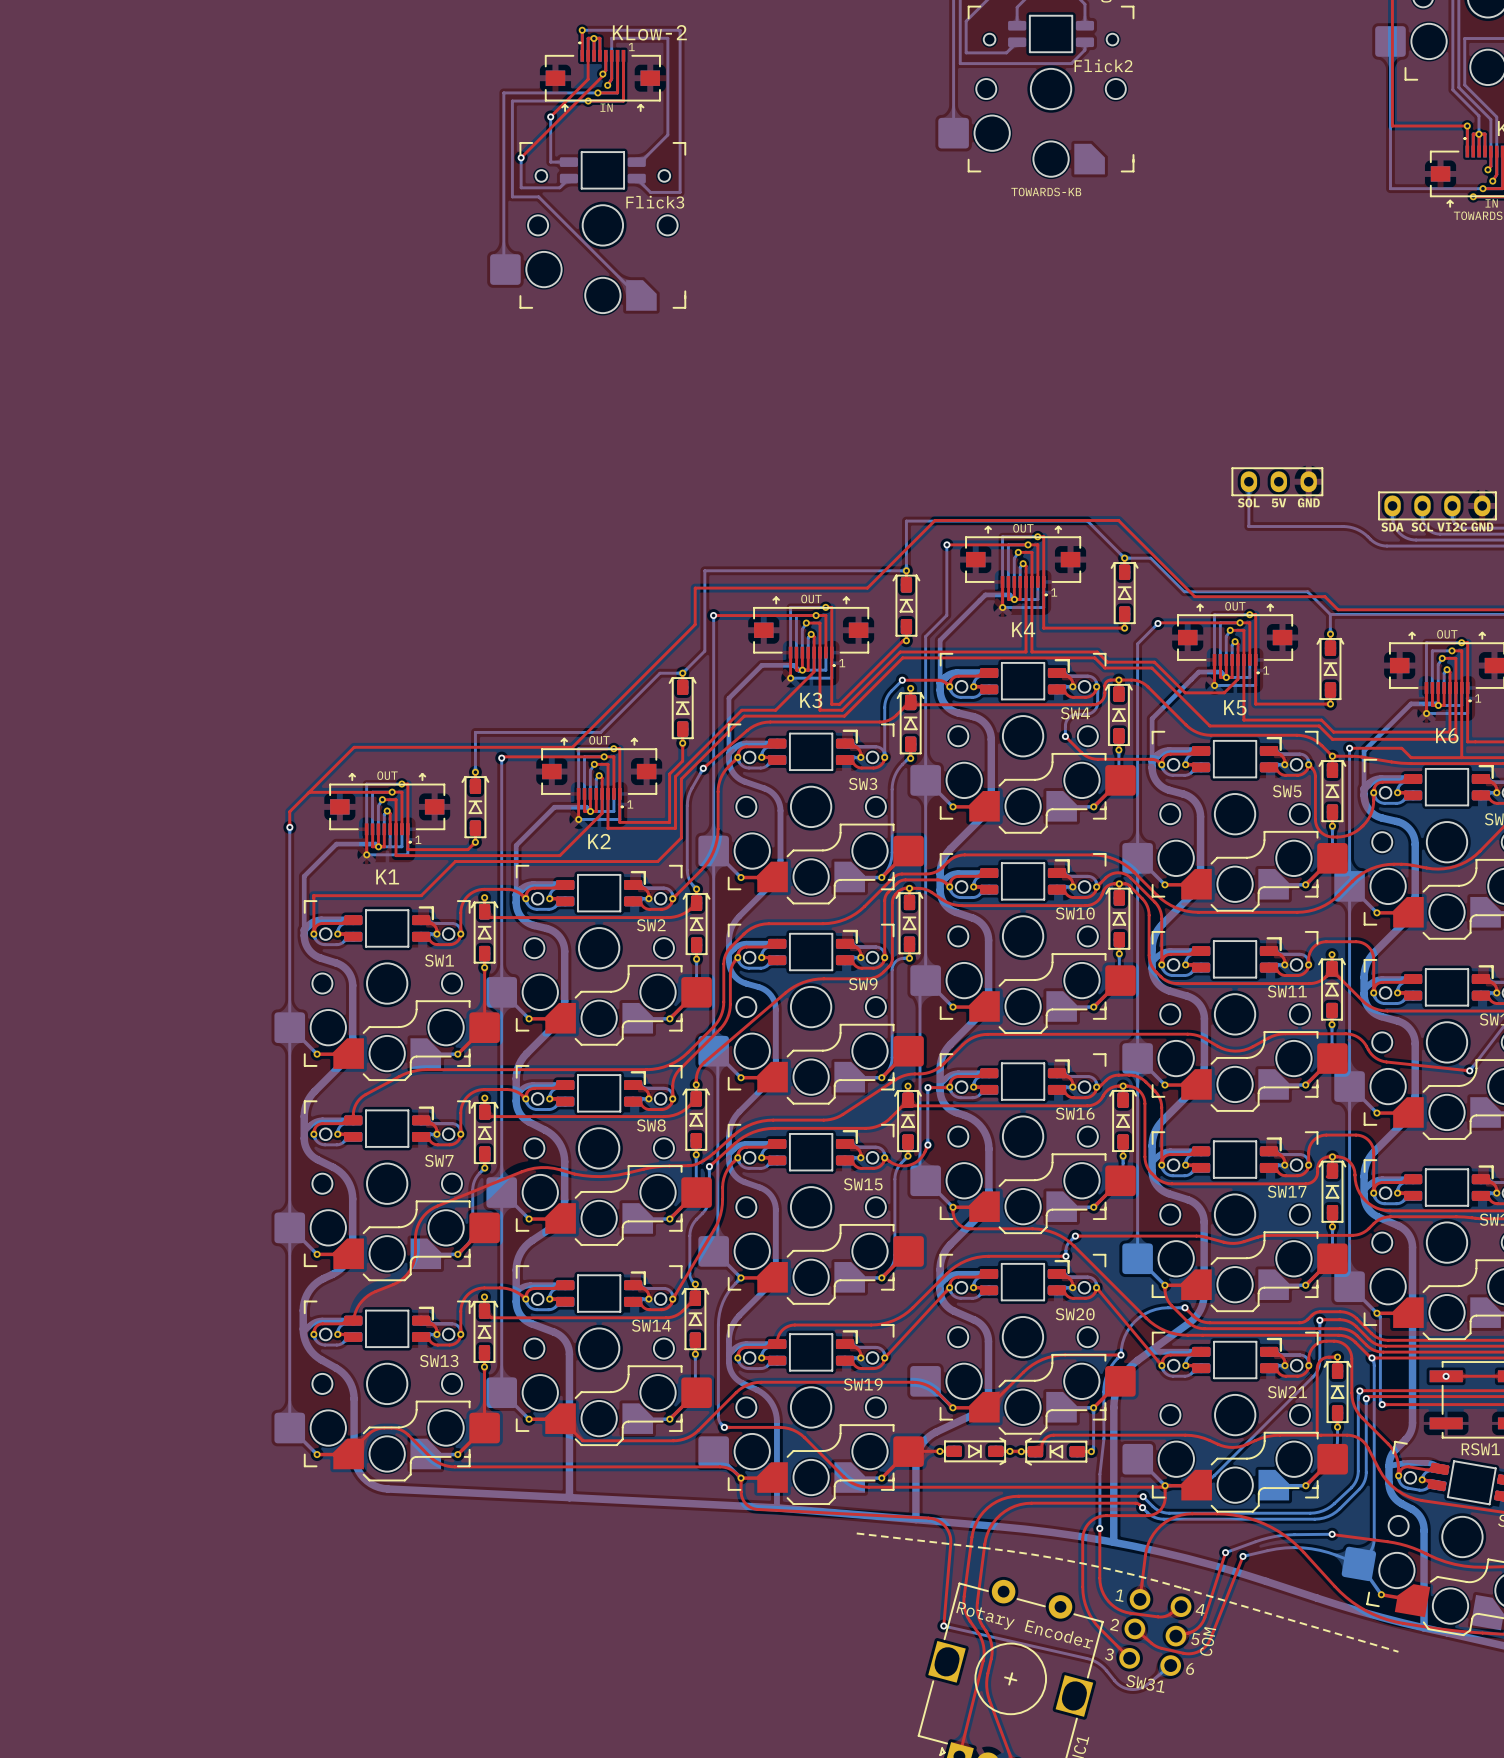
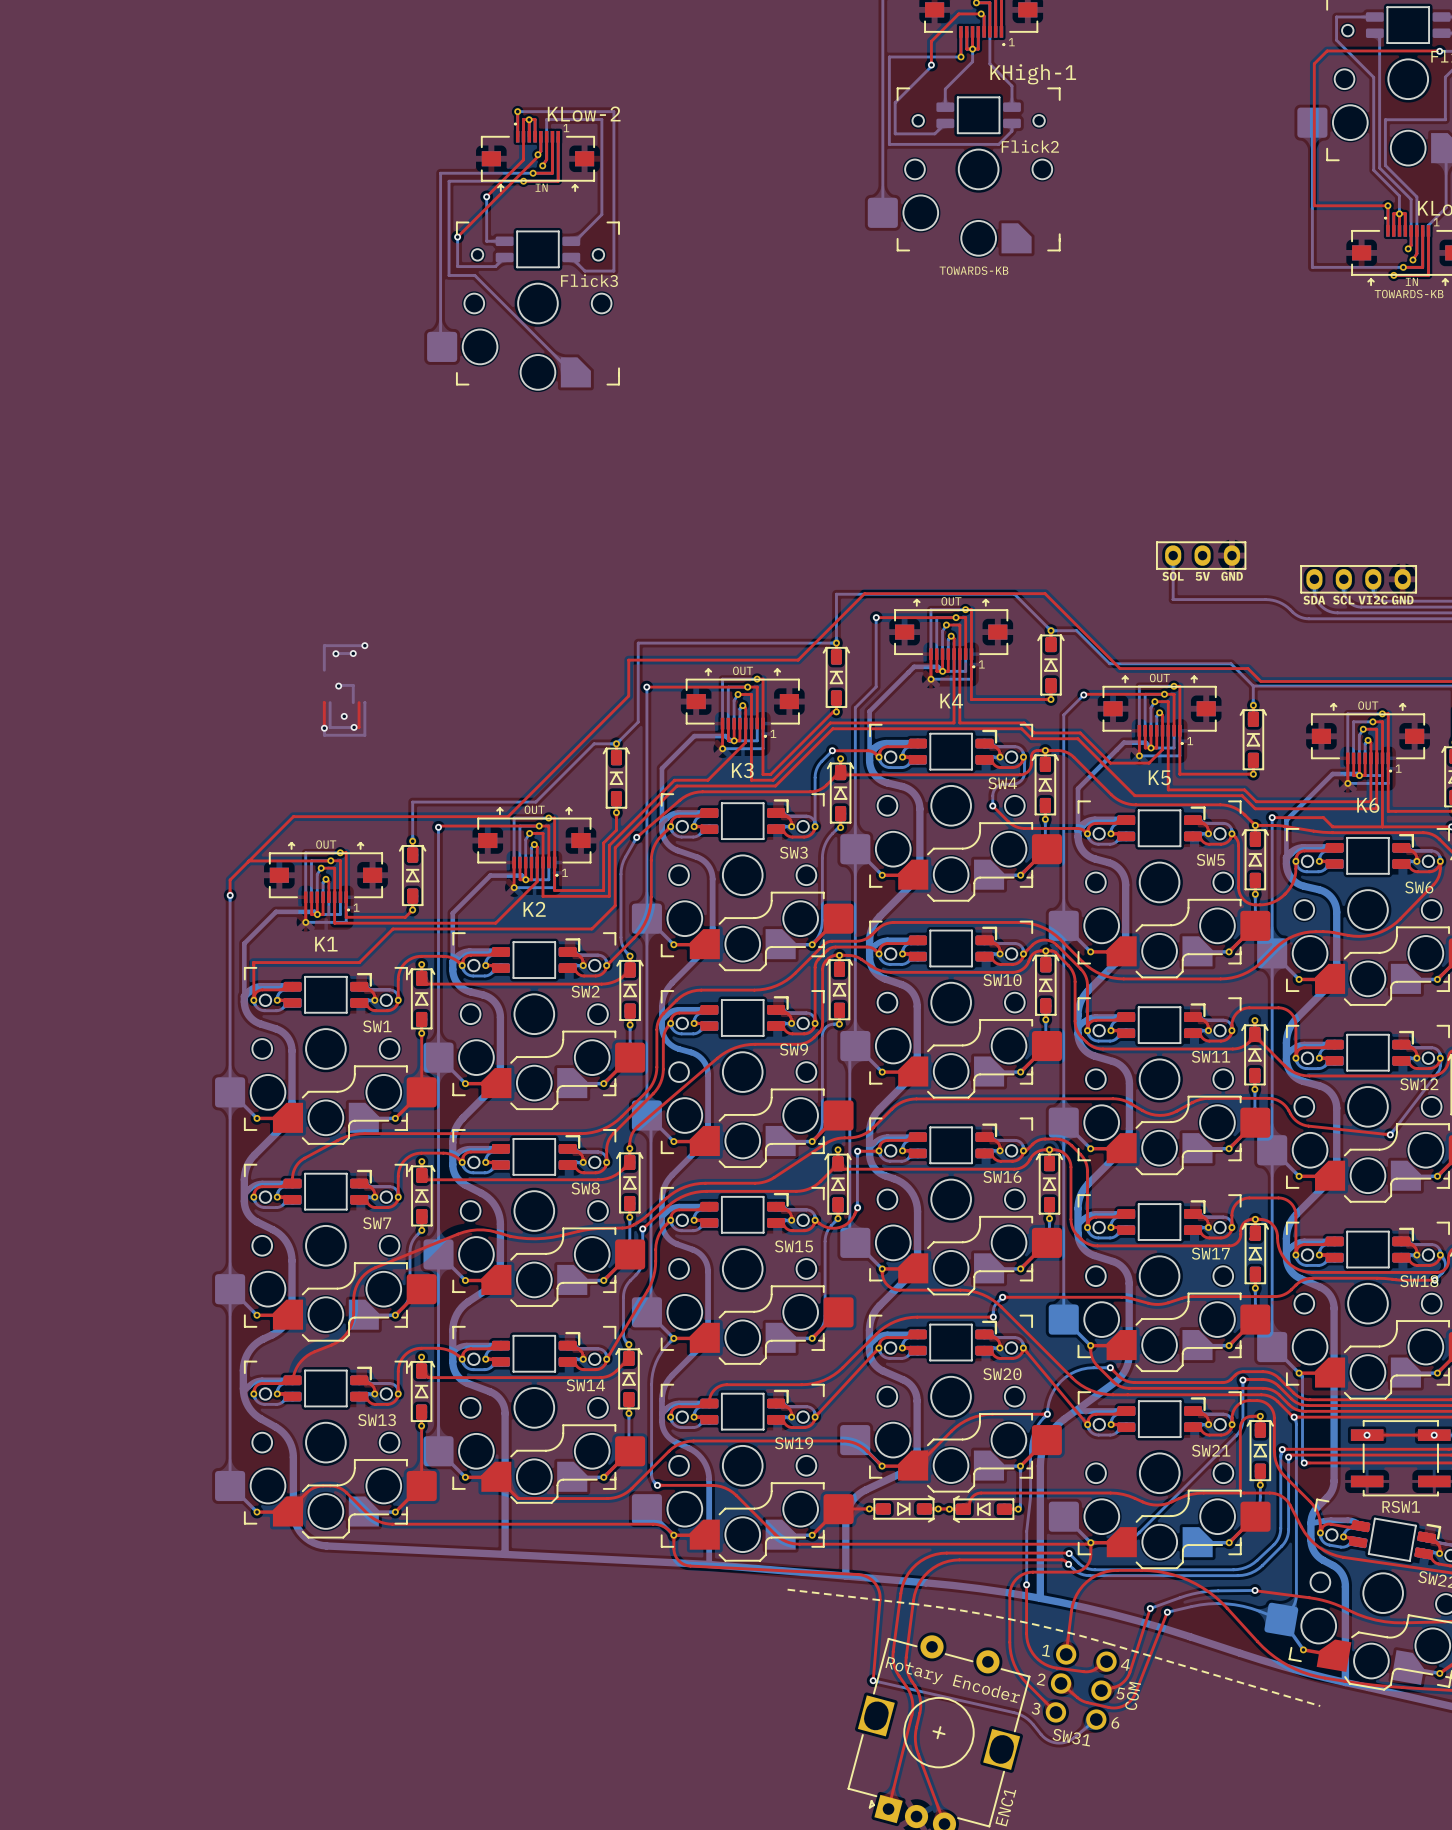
bottom track: none -> (364, 645) (324, 645) (324, 670)
via: none -> (364, 645)
via: none -> (335, 653)
bottom track: none -> (353, 653) (335, 653)
via: none -> (353, 653)
bottom track: none -> (338, 686) (353, 685) (353, 702)
via: none -> (338, 686)
top track: none -> (324, 702) (324, 728)
bottom track: none -> (330, 702) (330, 727) (353, 727)
top track: none -> (359, 702) (359, 727) (354, 727)
bottom track: none -> (364, 702) (364, 735) (324, 735) (324, 728)
via: none -> (344, 716)
via: none -> (354, 727)
via: none -> (324, 728)

